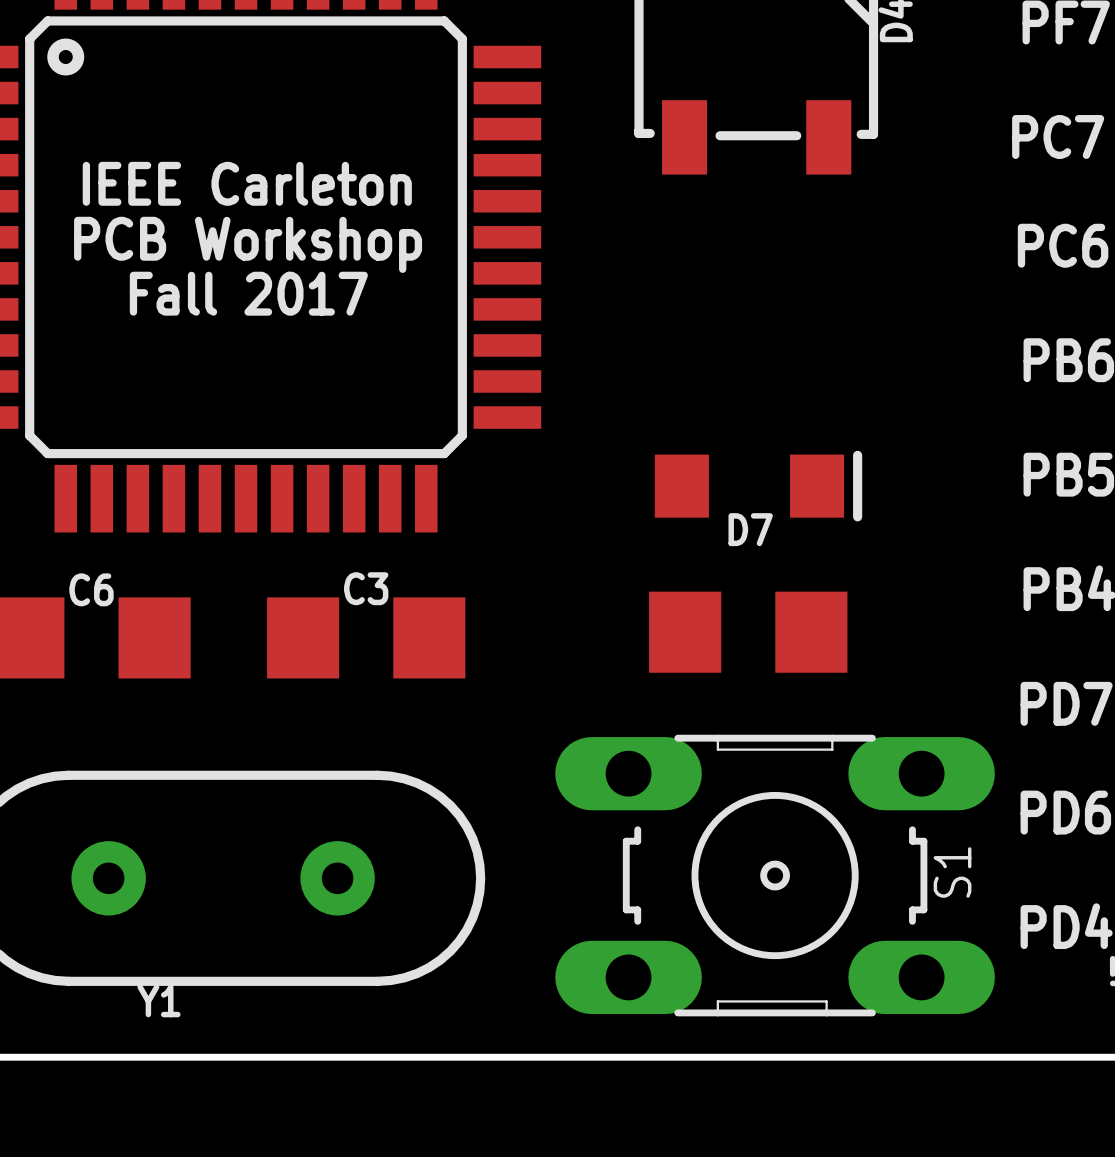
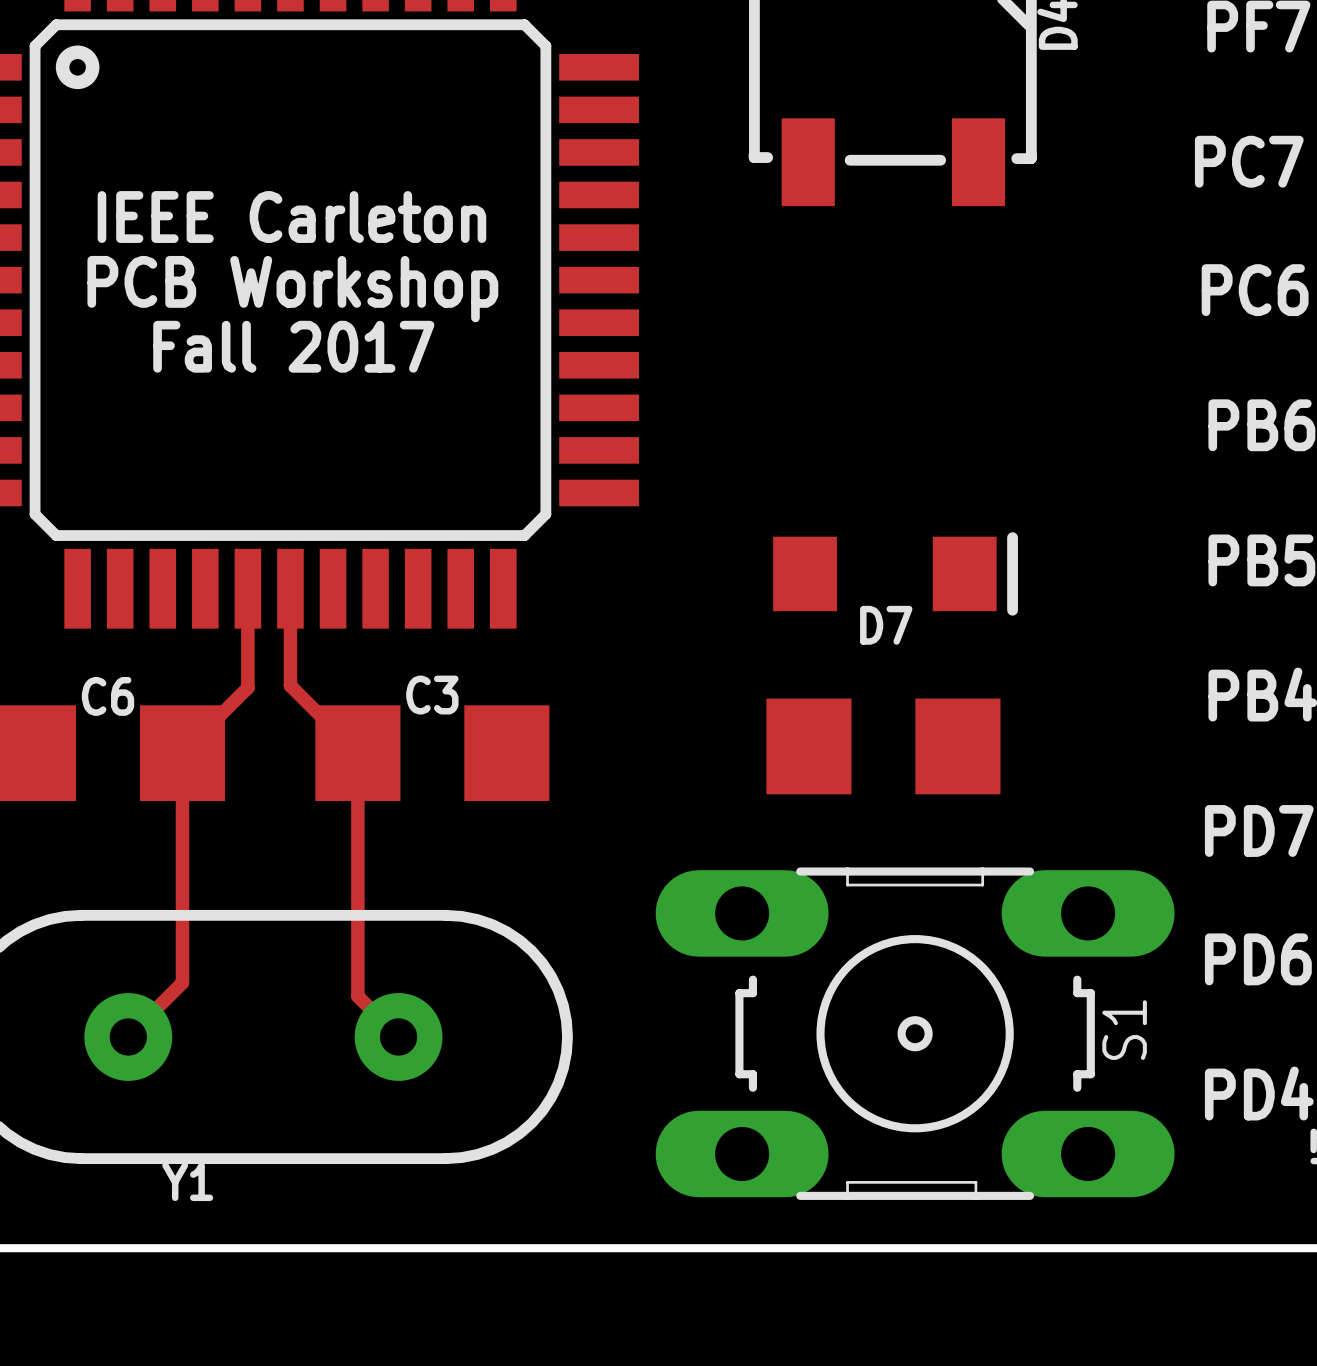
track: none -> (247, 588) (247, 687) (182, 753) (182, 982) (128, 1036)
track: none -> (290, 588) (290, 685) (357, 753) (357, 996) (398, 1036)

